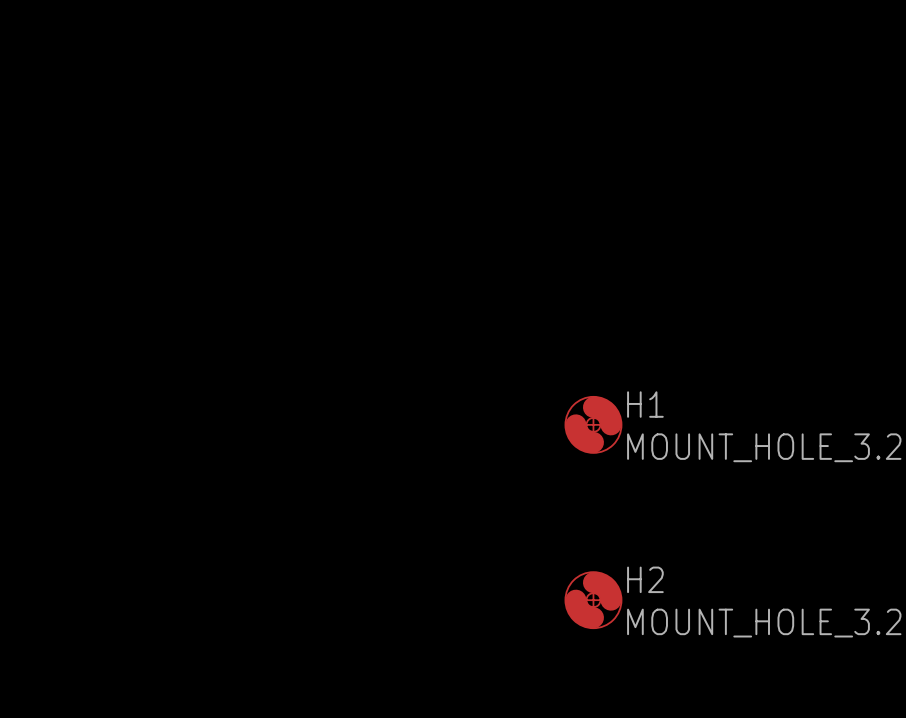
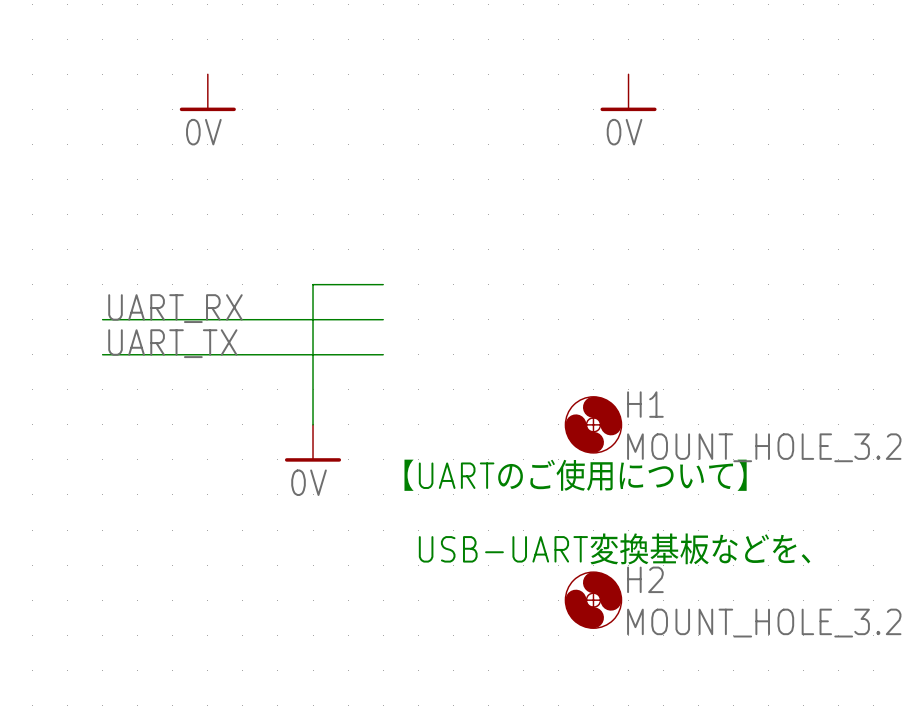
power symbol: none -> 0V (207, 92)
power symbol: none -> 0V (628, 92)
wire: none -> (383, 284) (313, 284) (313, 424)
label: none -> UART_RX (175, 308)
wire: none -> (102, 319) (383, 319)
label: none -> UART_TX (172, 343)
wire: none -> (102, 354) (383, 354)
power symbol: none -> 0V (313, 443)
text: none -> 【UARTのご使用について】 (575, 475)
text: none -> USB-UART変換基板などを、 (615, 548)

